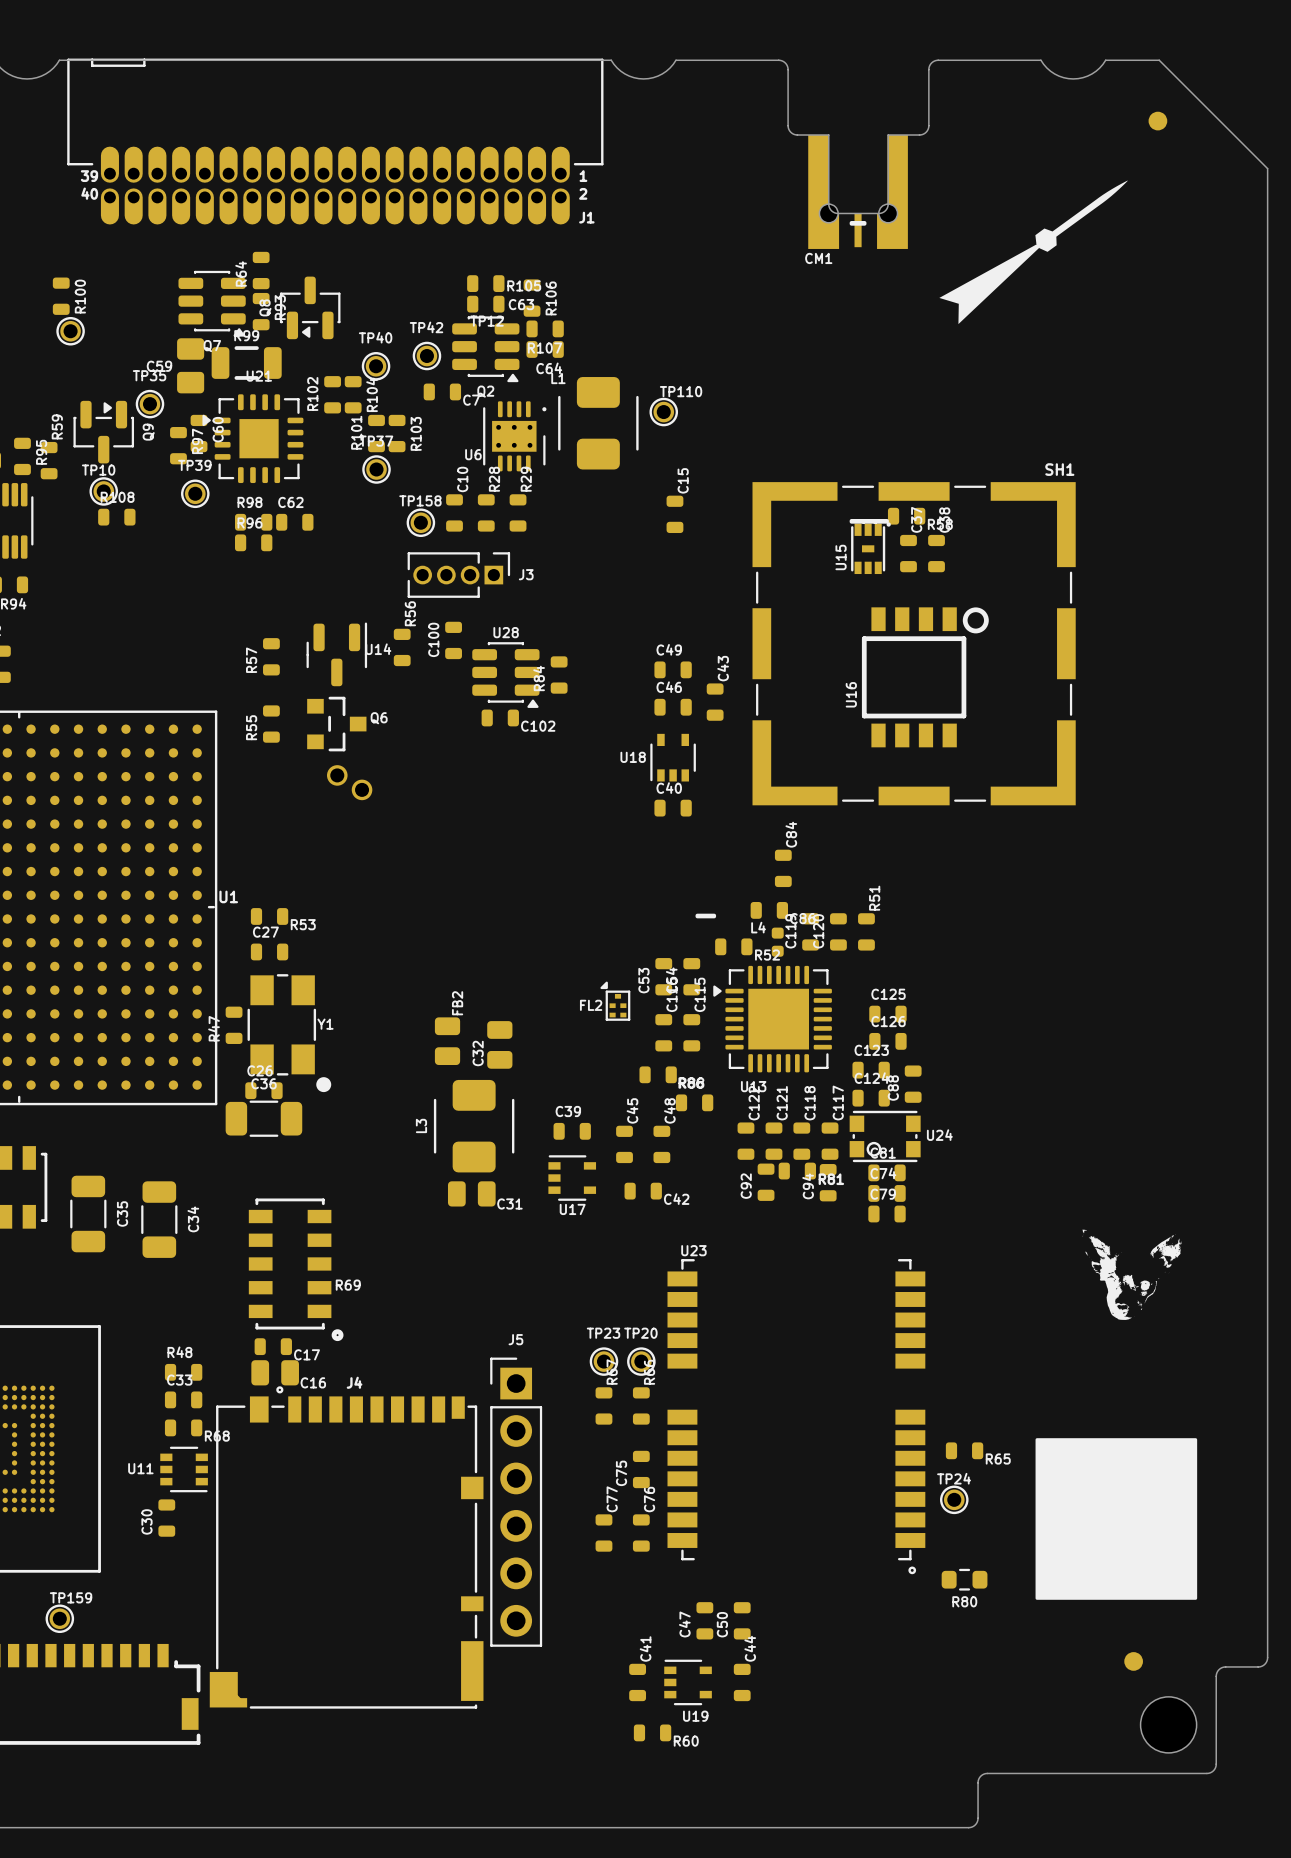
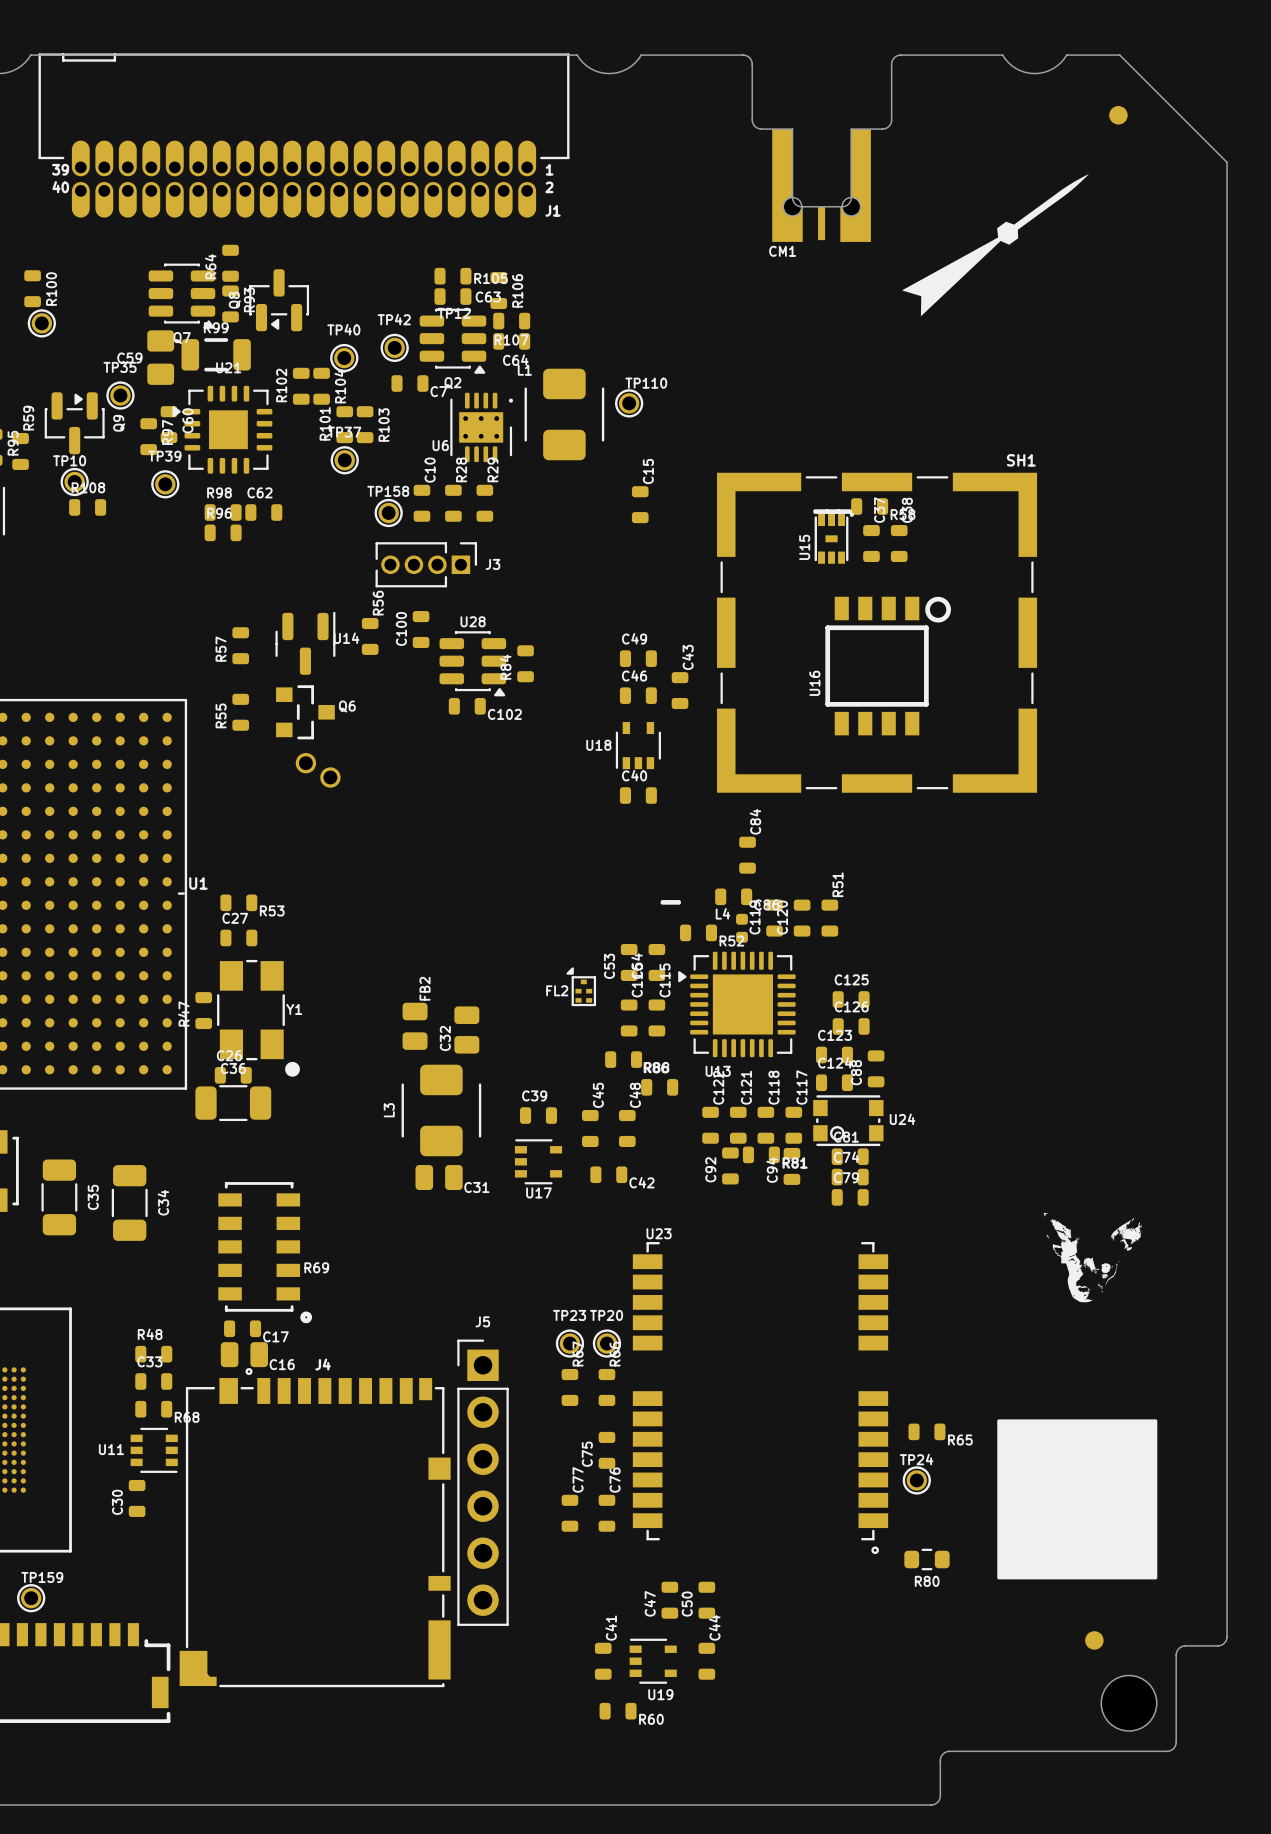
drawing: [849, 221, 867, 226] -> none

